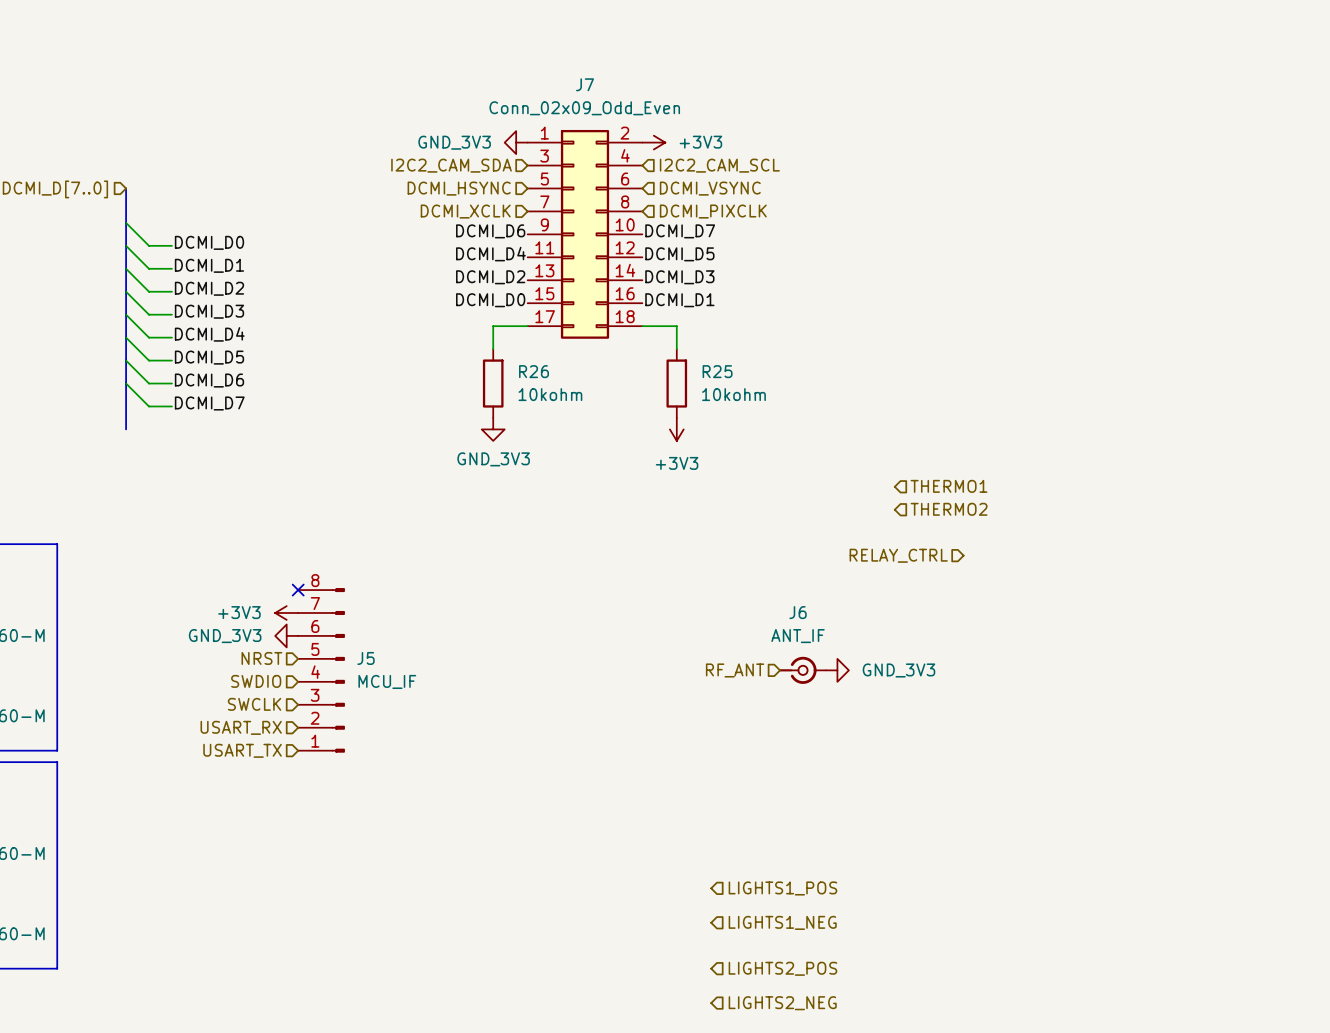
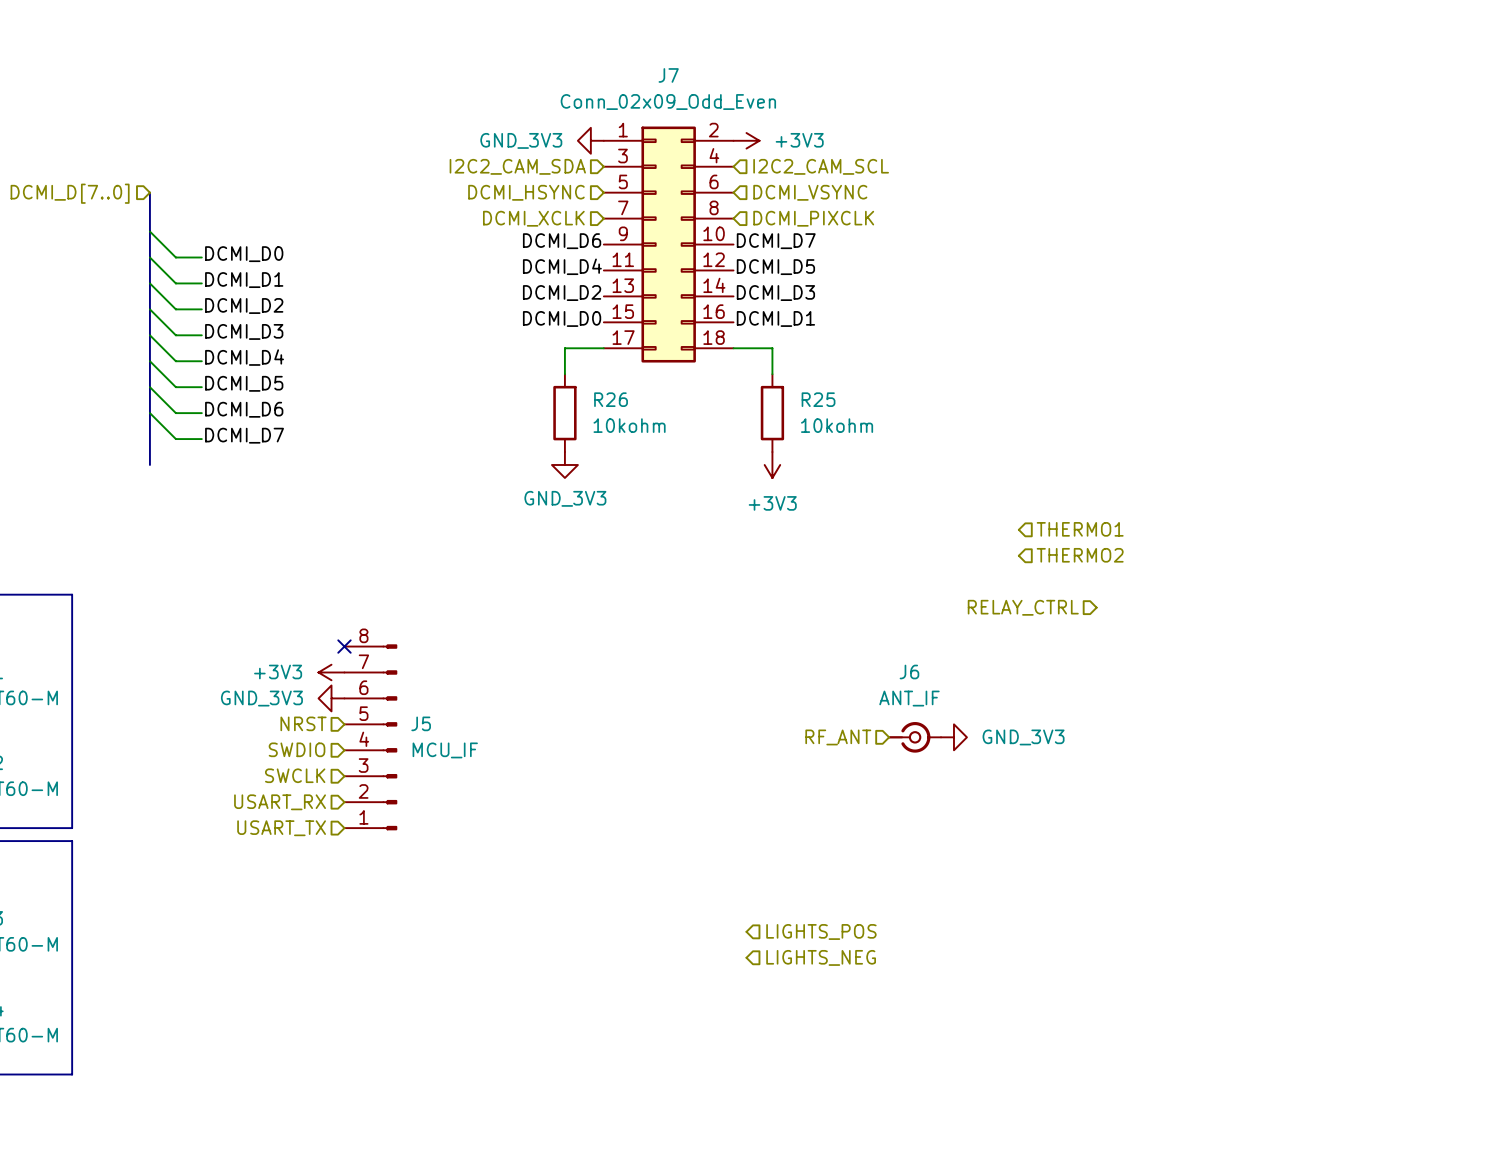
hierarchical label: none -> LIGHTS_POS (821, 931)
hierarchical label: LIGHTS1_POS (782, 888) -> LIGHTS_NEG (821, 957)
hierarchical label: LIGHTS1_NEG (782, 922) -> none
hierarchical label: LIGHTS2_POS (782, 968) -> none
hierarchical label: LIGHTS2_NEG (782, 1003) -> none

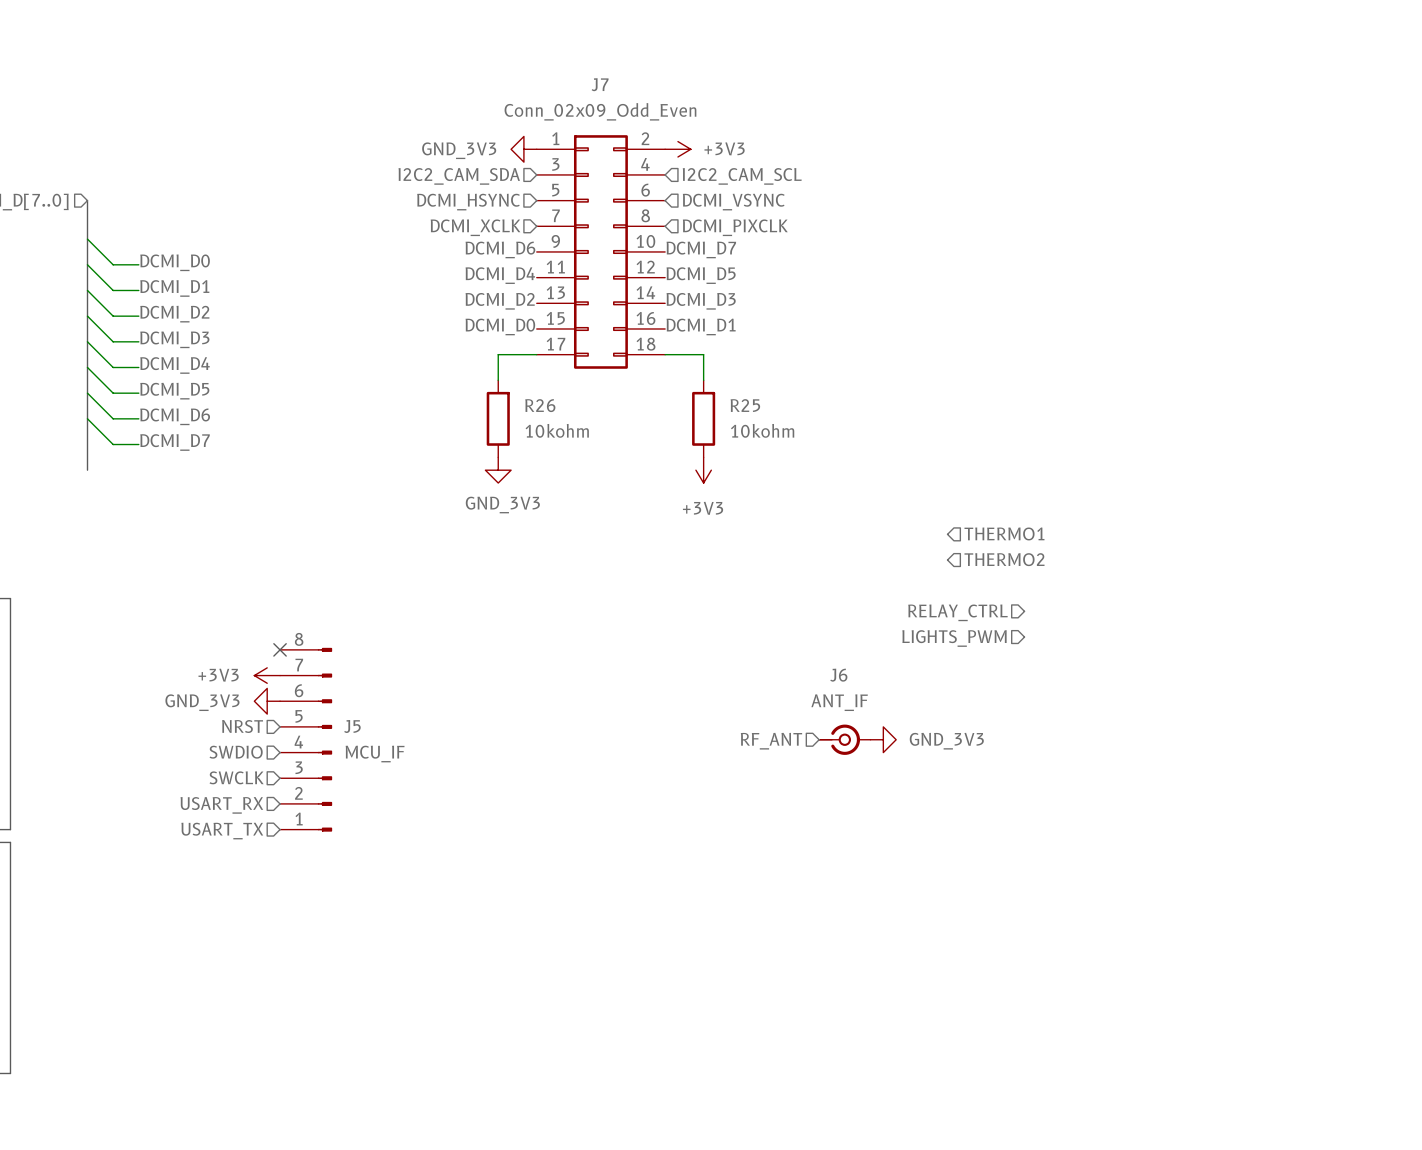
hierarchical label: none -> LIGHTS_PWM (954, 638)
hierarchical label: LIGHTS_POS (821, 931) -> none
hierarchical label: LIGHTS_NEG (821, 957) -> none

